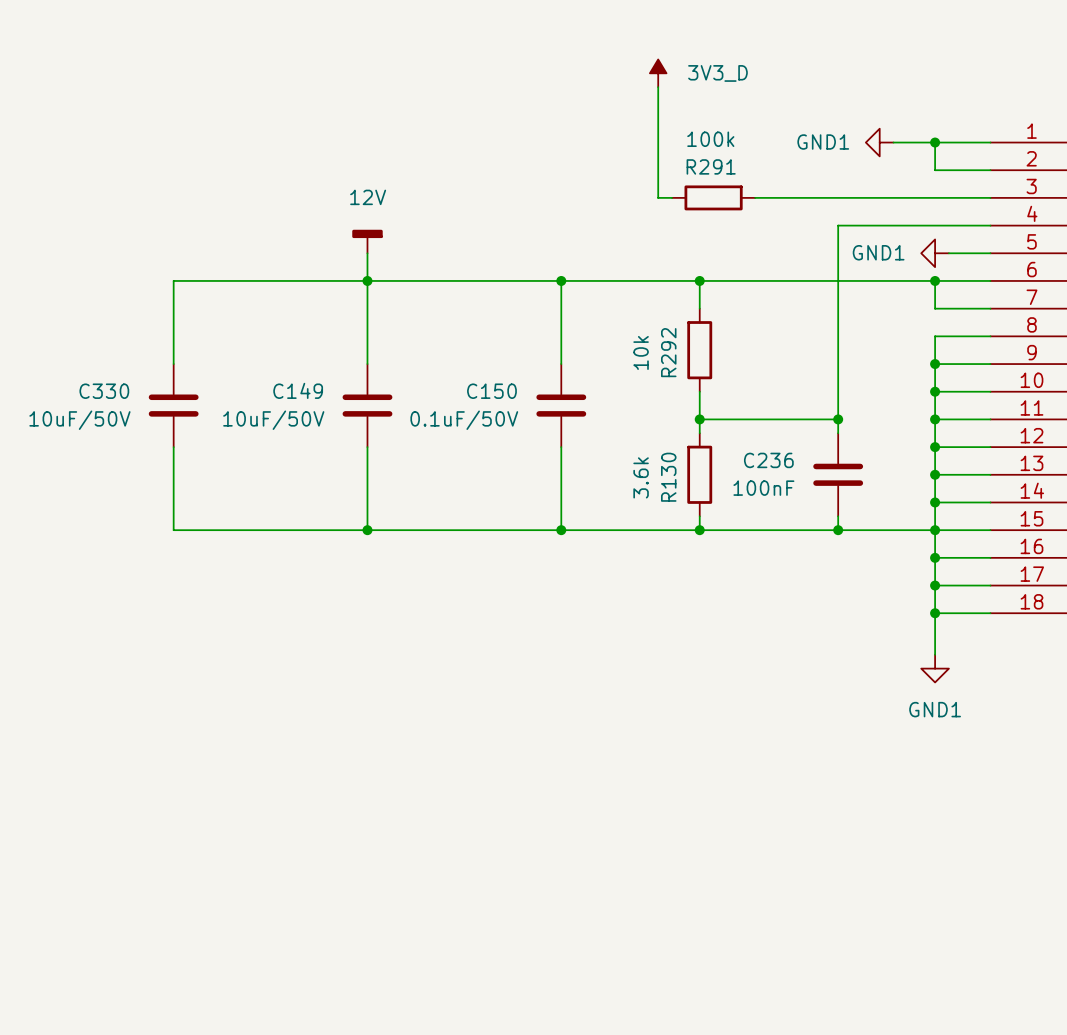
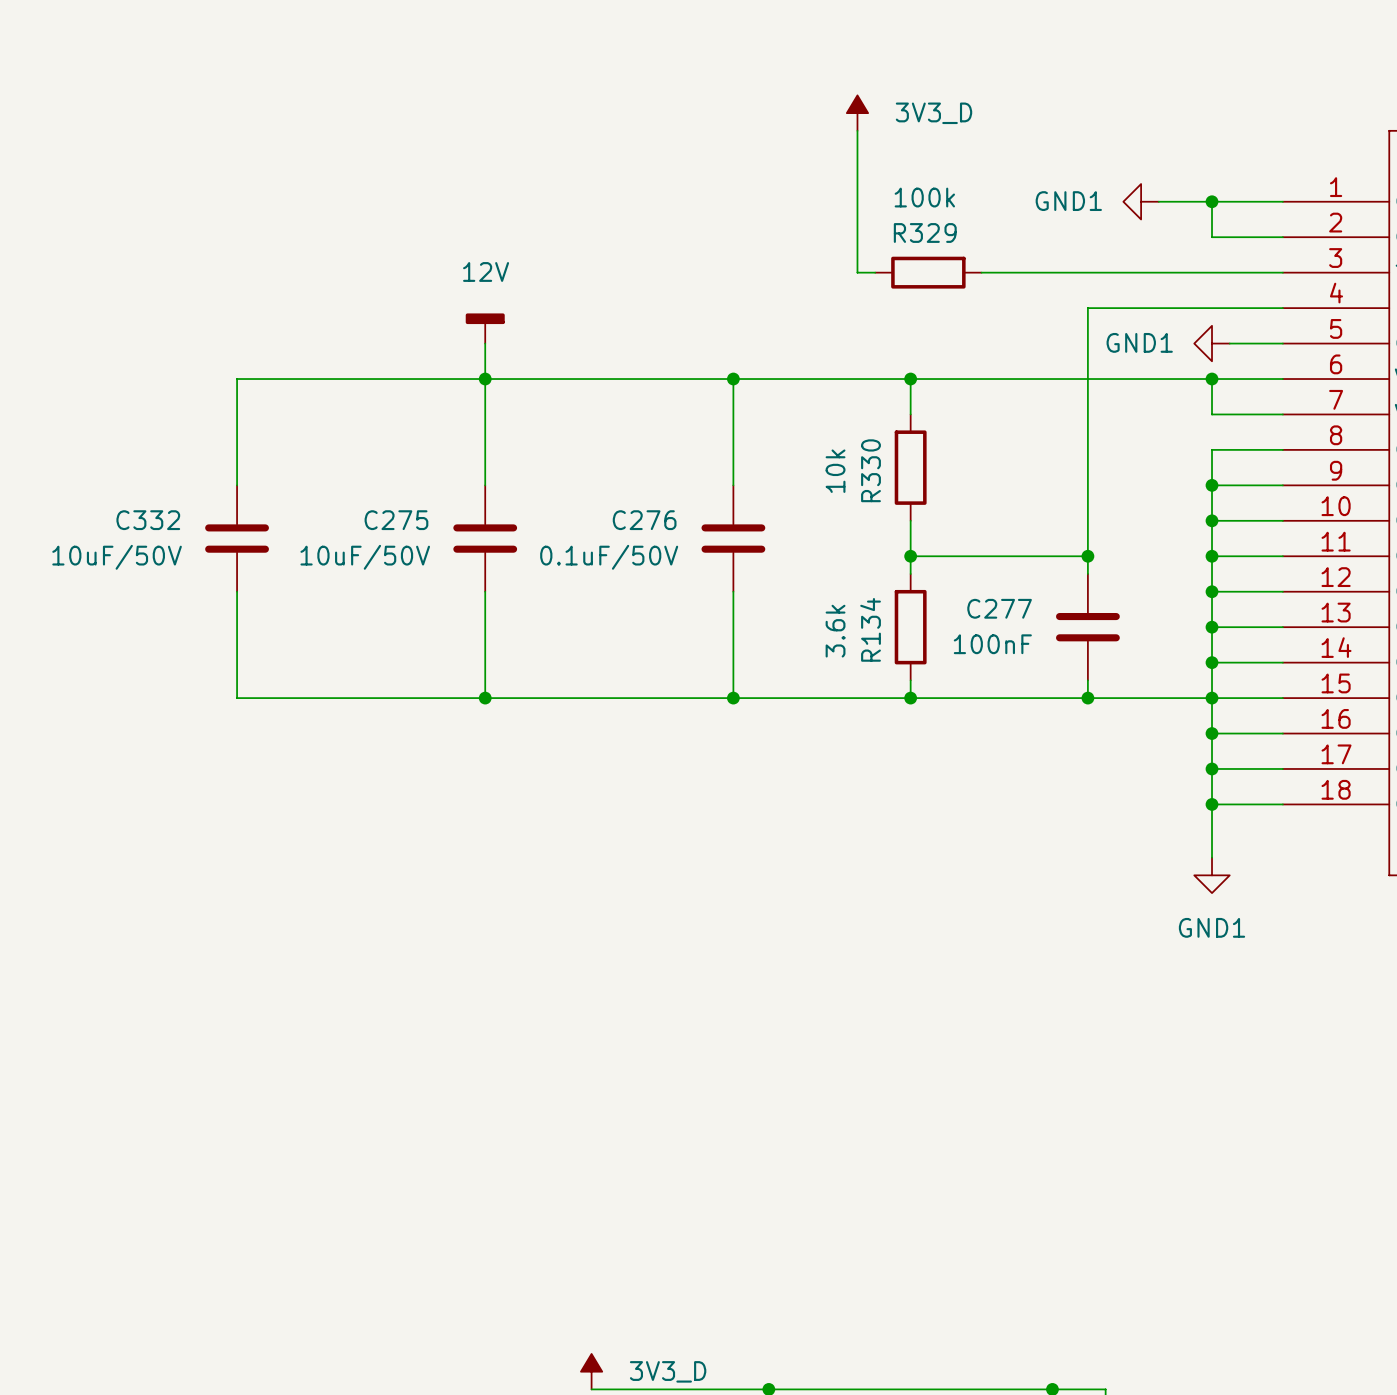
R291 name: R291 (711, 166) -> R329 (925, 232)
R292 name: R292 (668, 352) -> R330 (870, 470)
C149 name: C149 (298, 390) -> C275 (396, 520)
C330 name: C330 (104, 391) -> C332 (148, 520)
C150 name: C150 (491, 391) -> C276 (644, 520)
C236 name: C236 (768, 460) -> C277 (999, 608)
R130 name: R130 (668, 477) -> R134 (870, 629)

